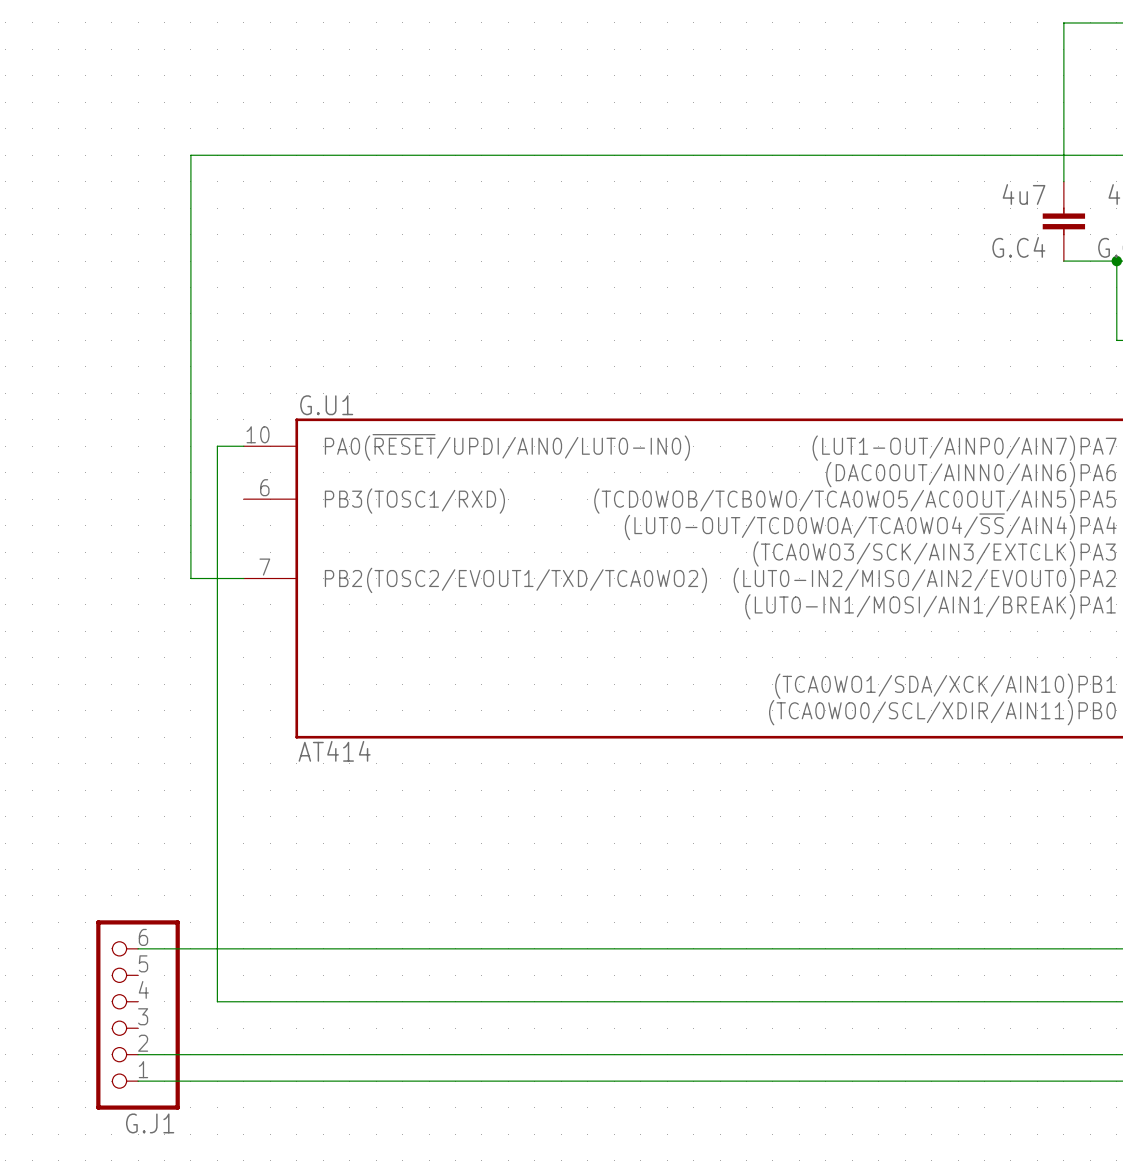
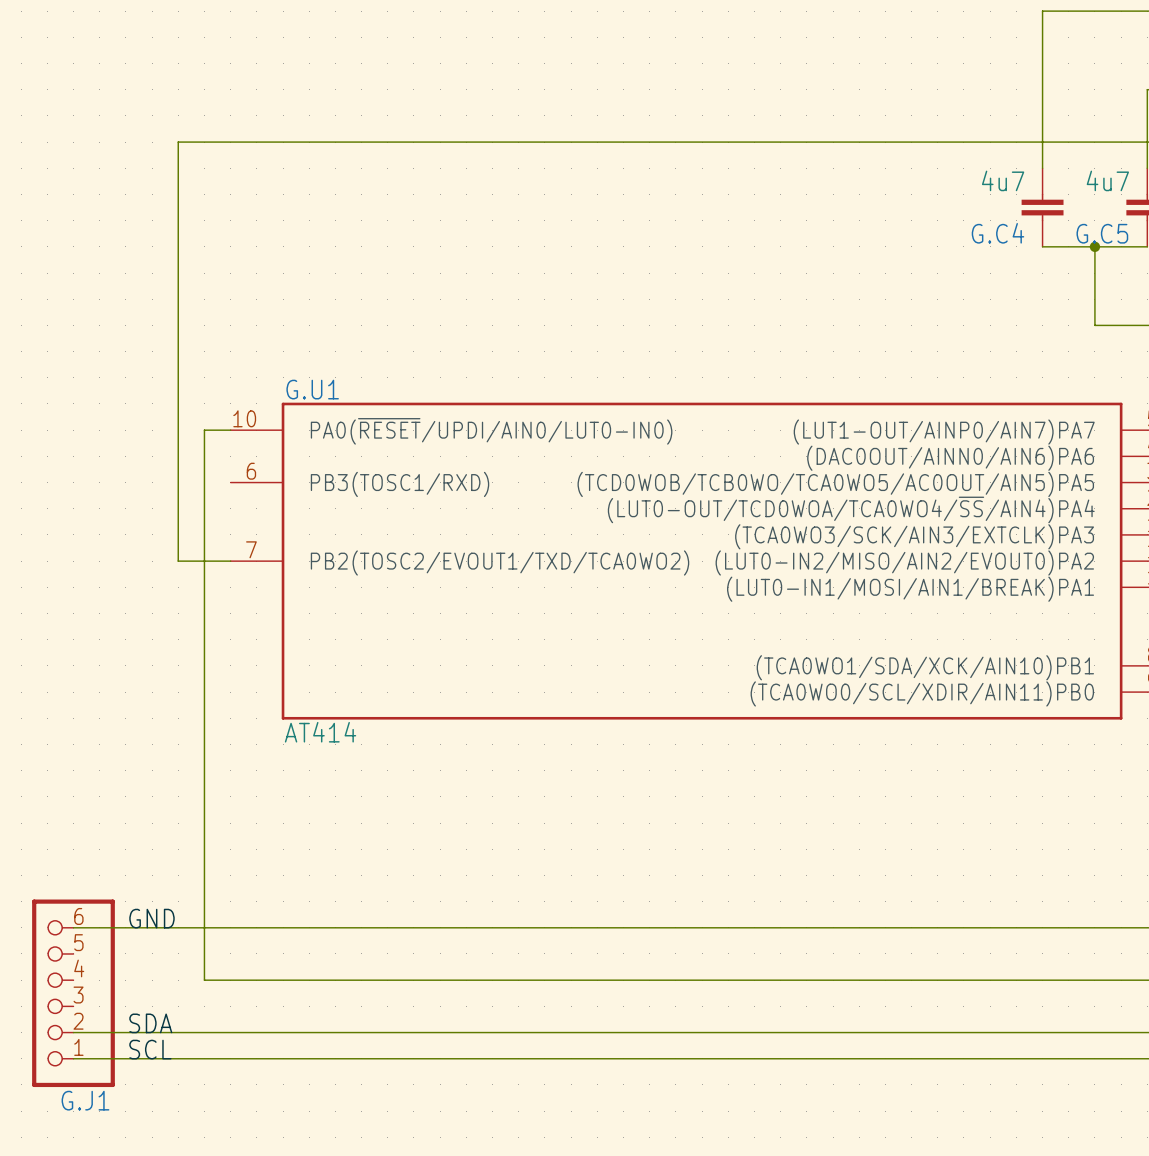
label: none -> GND (151, 918)
wire: none -> (73, 927) (125, 927)
G.J1 position: (138, 1014) -> (73, 993)
label: none -> SDA (150, 1023)
wire: none -> (73, 1032) (125, 1032)
label: none -> SCL (150, 1049)
wire: none -> (73, 1058) (125, 1058)

